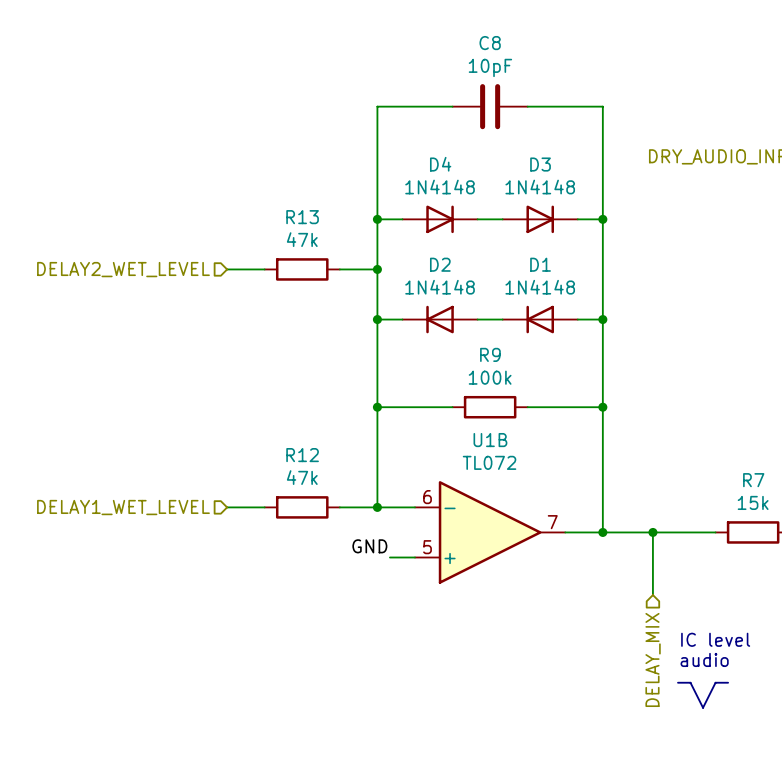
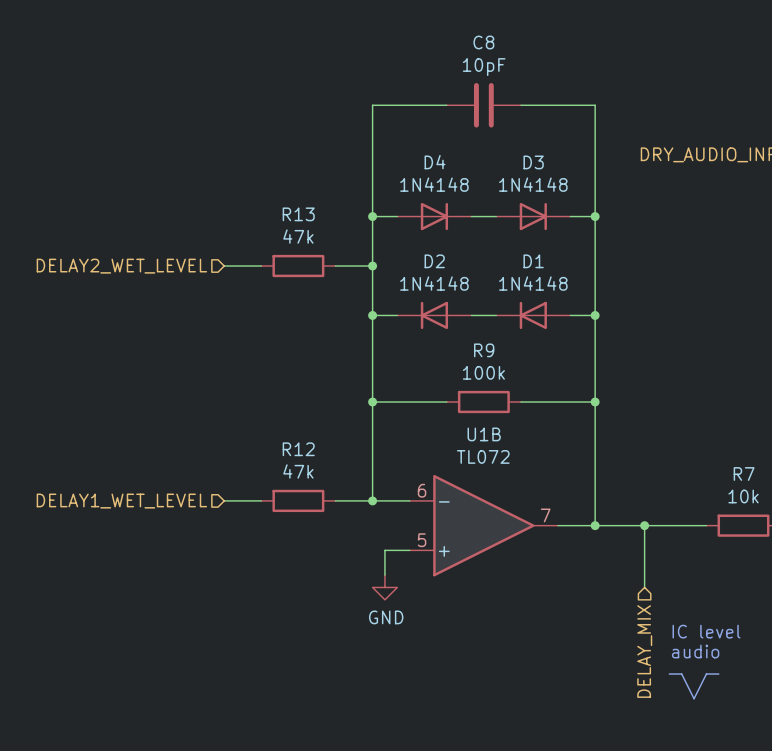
R7 value: 15k (753, 502) -> 10k (743, 496)
label: GND (369, 546) -> none
wire: none -> (384, 550) (384, 575)
power symbol: none -> GND (384, 587)

